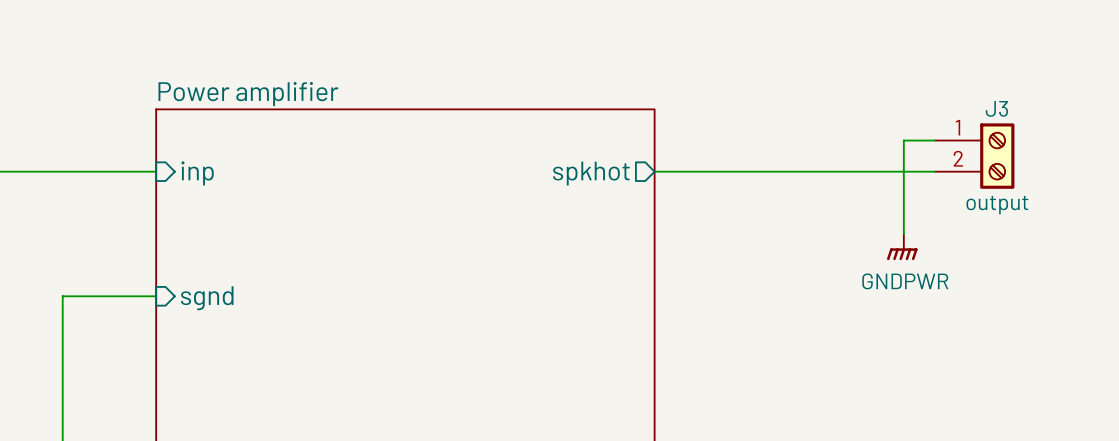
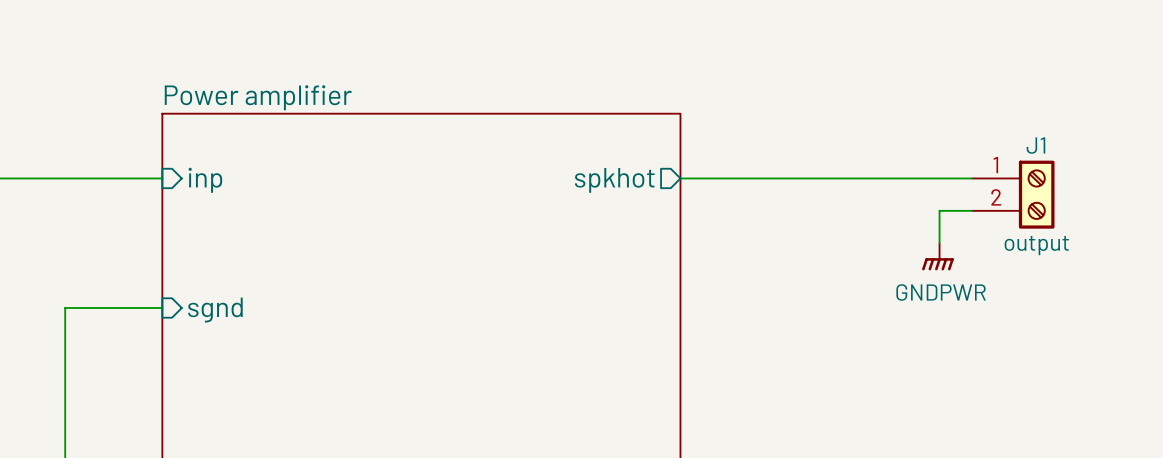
wire: (934, 140) (903, 140) (903, 202) -> (971, 210) (939, 210)
J3: output (974, 156) -> none
J1: none -> output (1013, 194)

